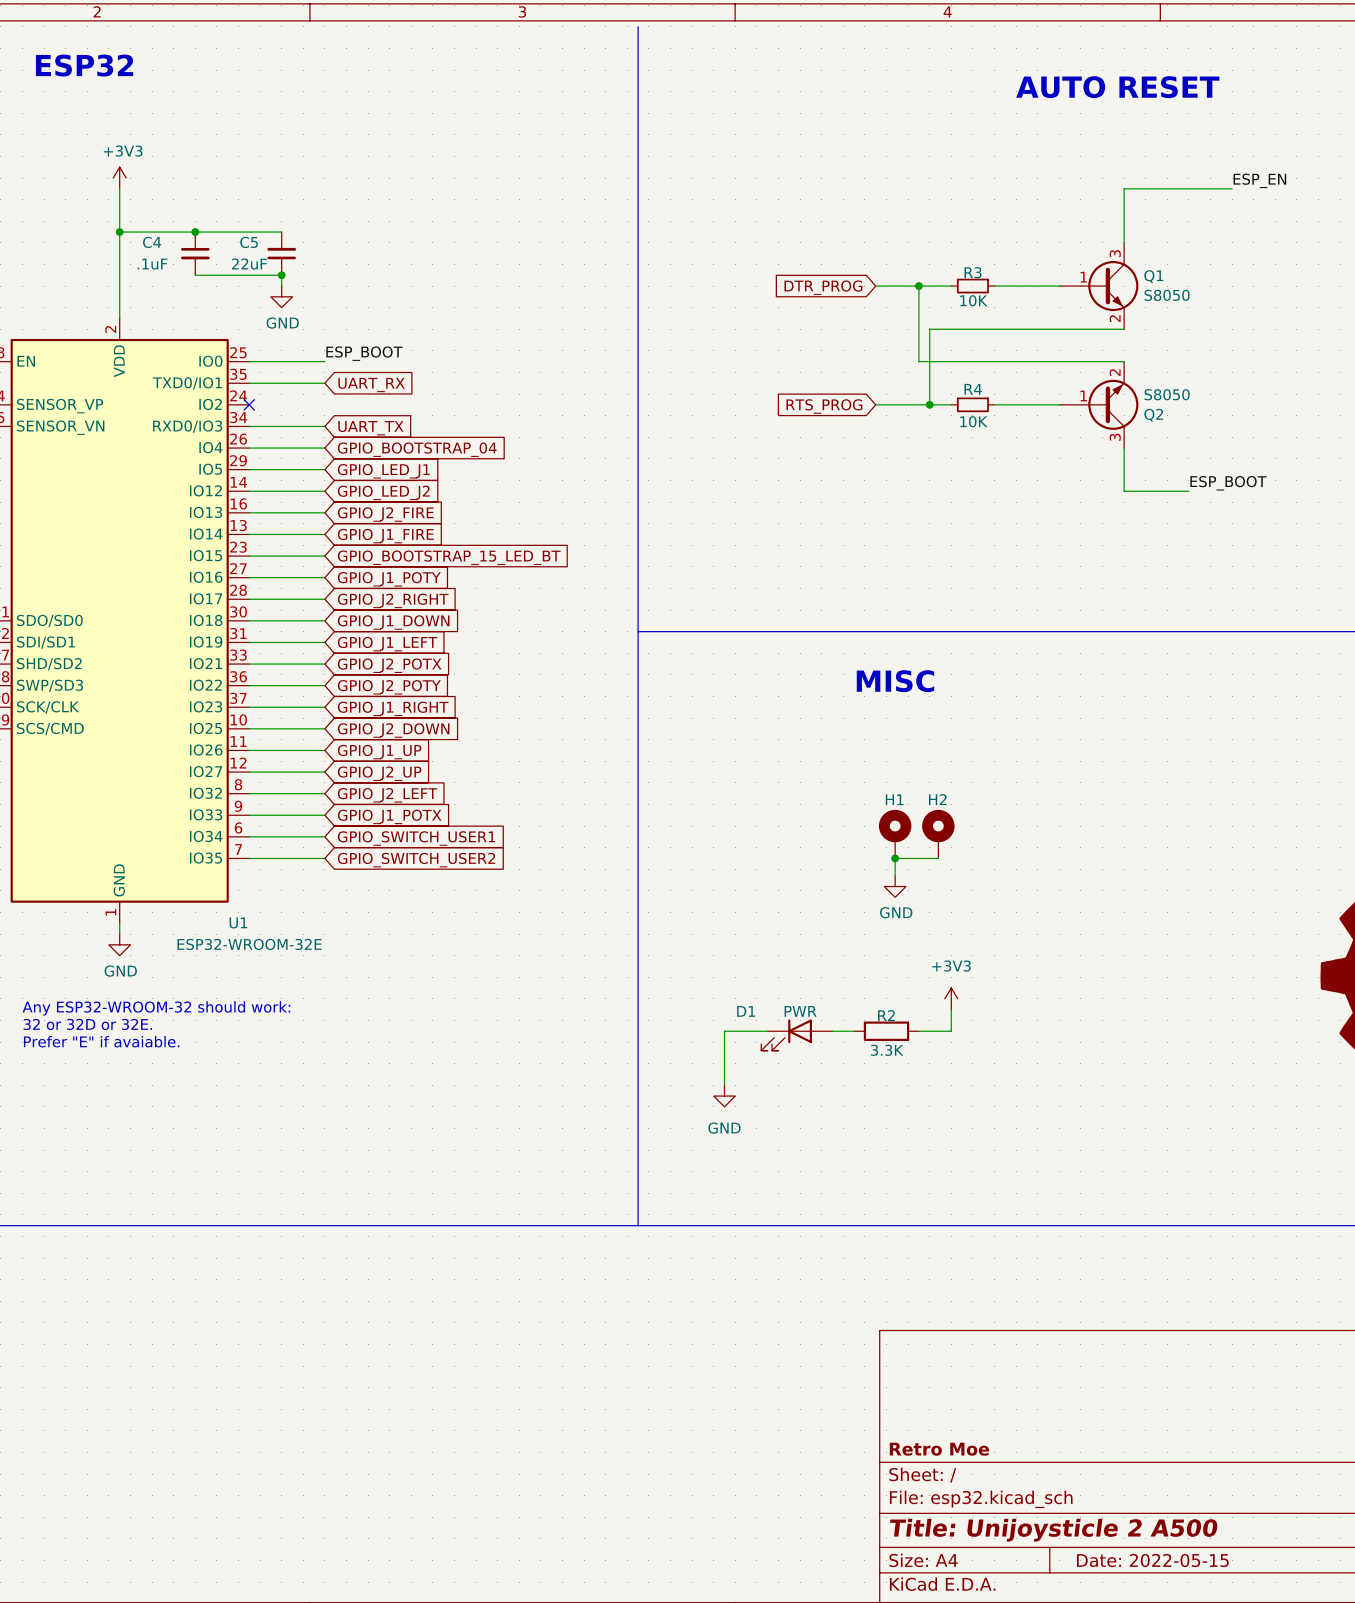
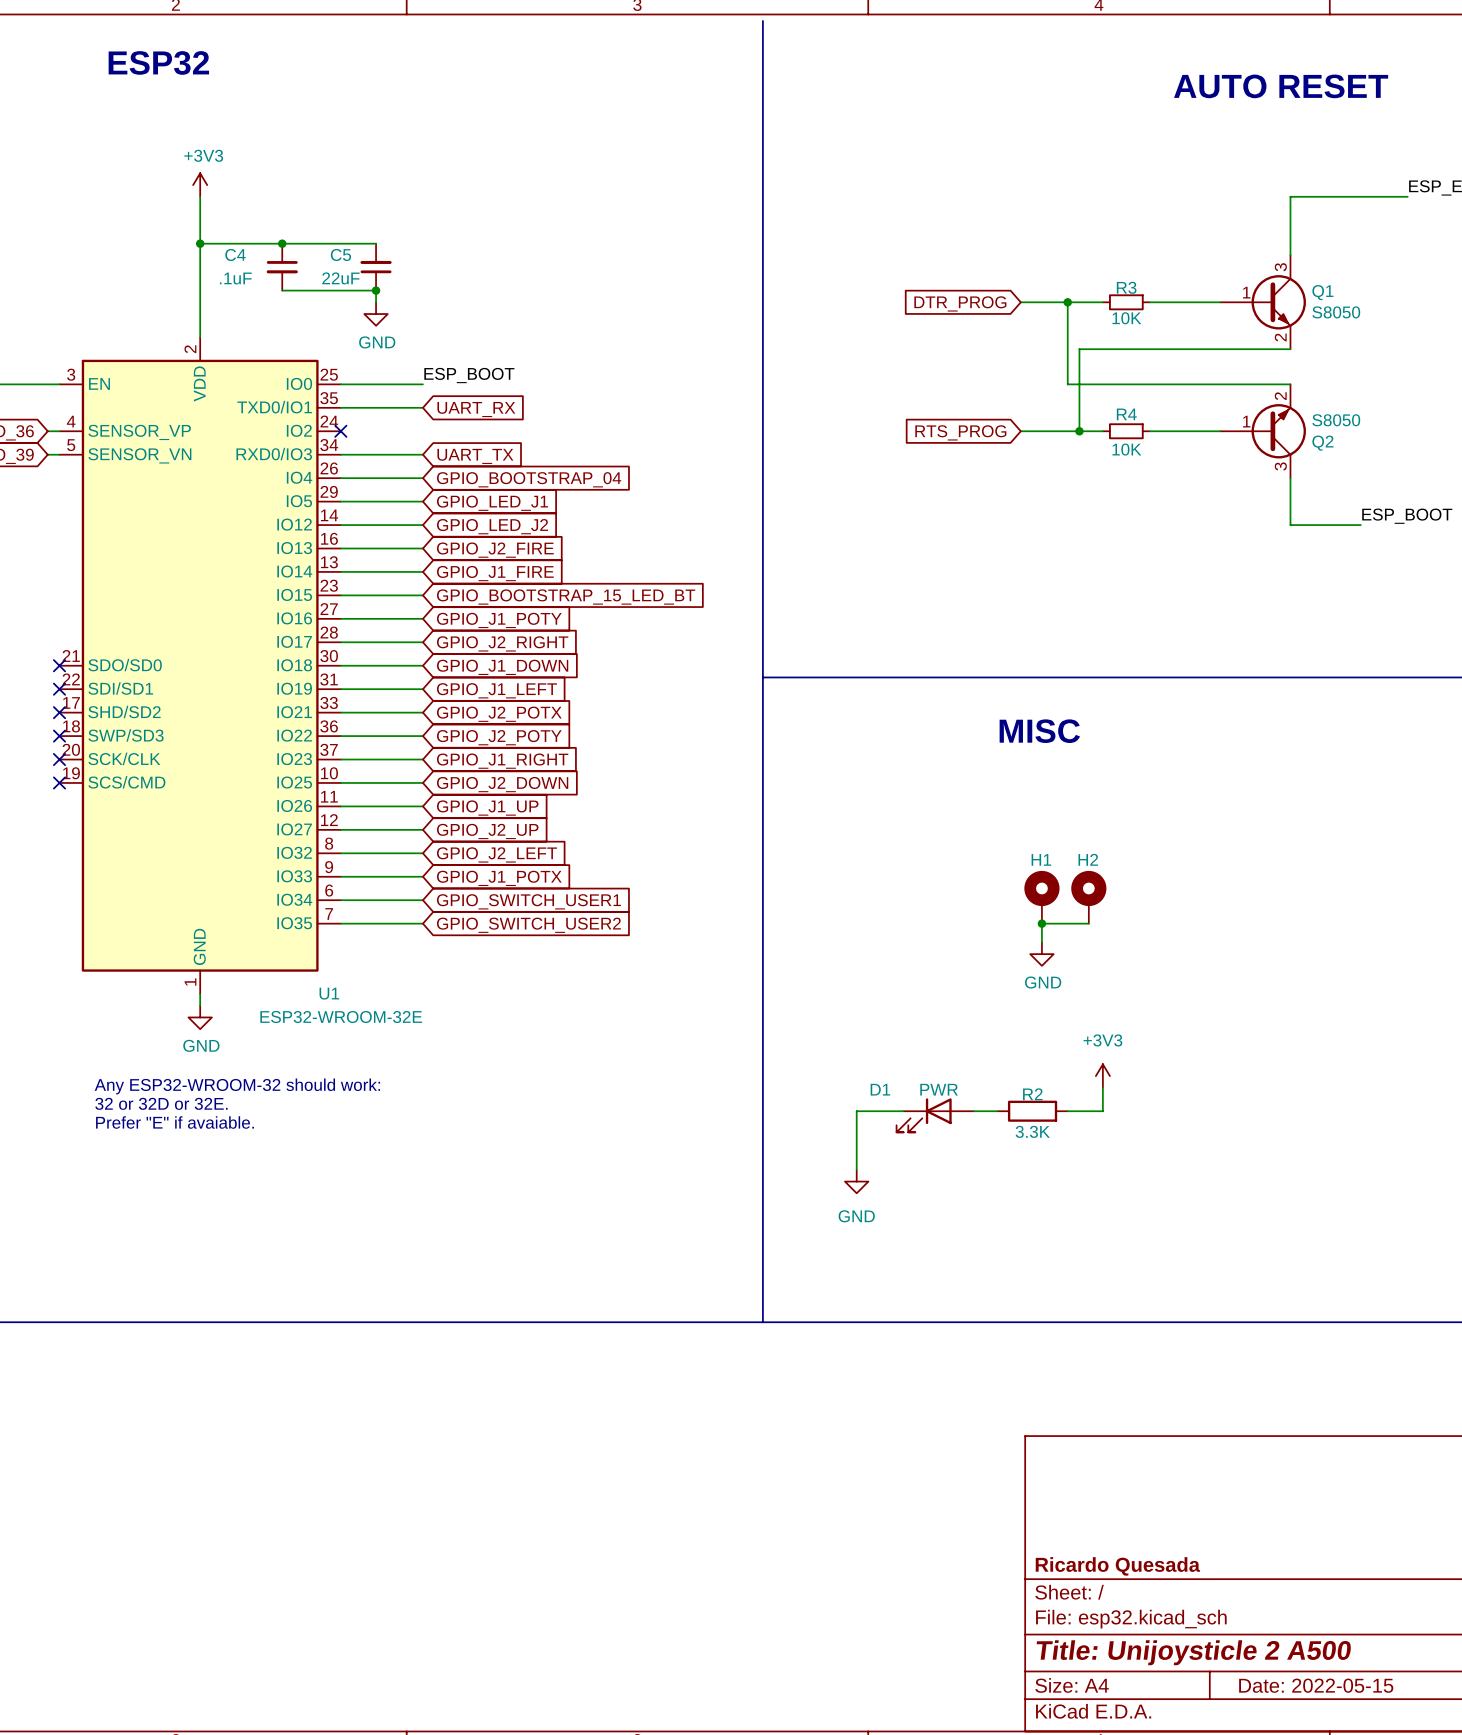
title block: Retro Moe (939, 1449) -> Ricardo Quesada (1117, 1566)

